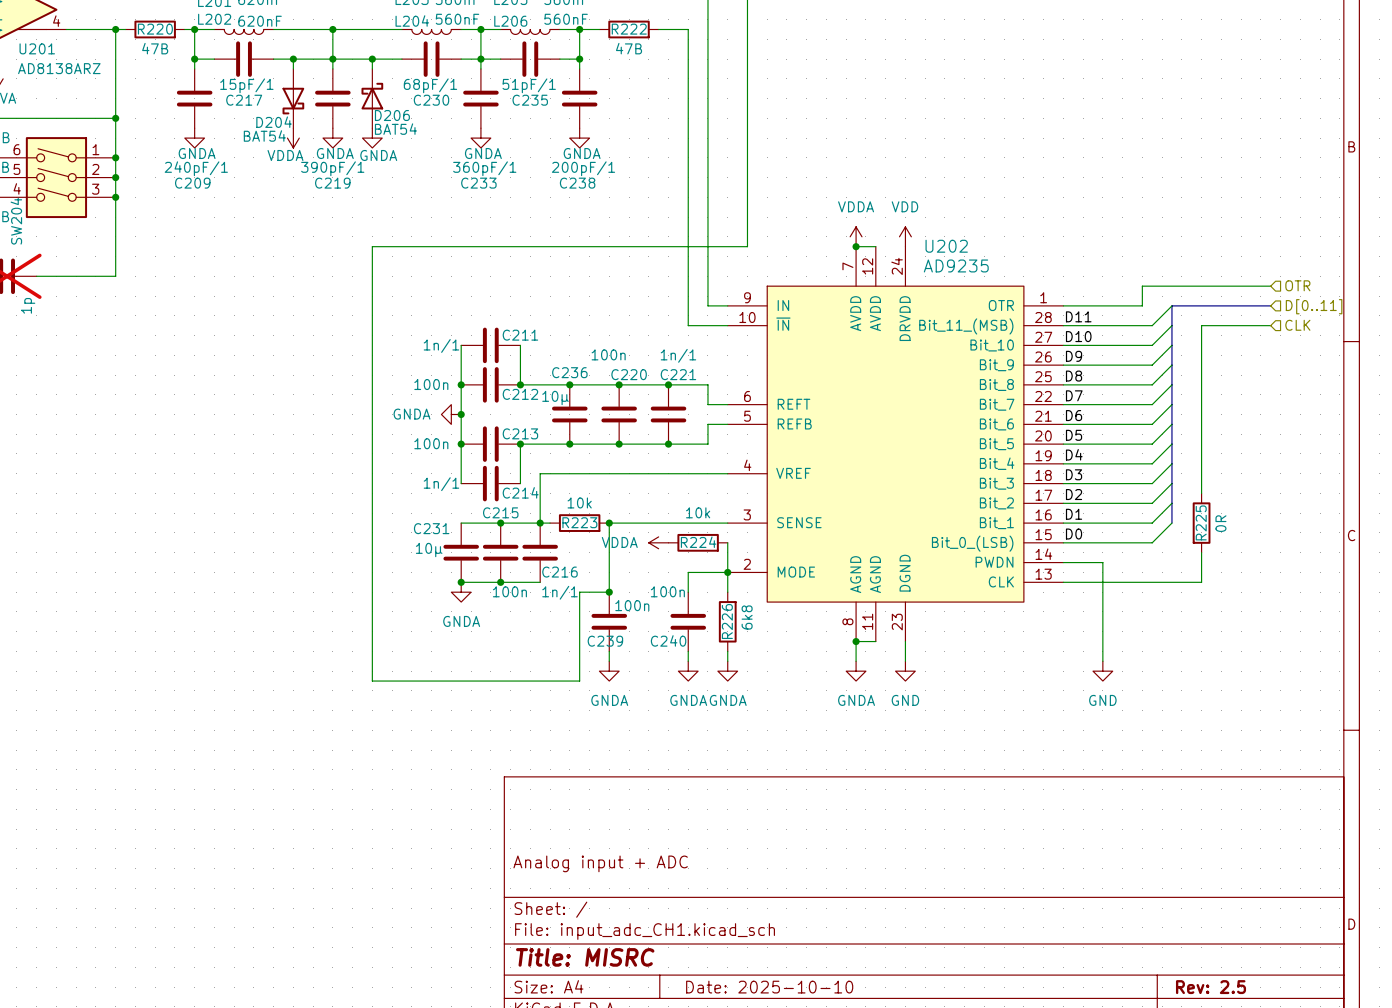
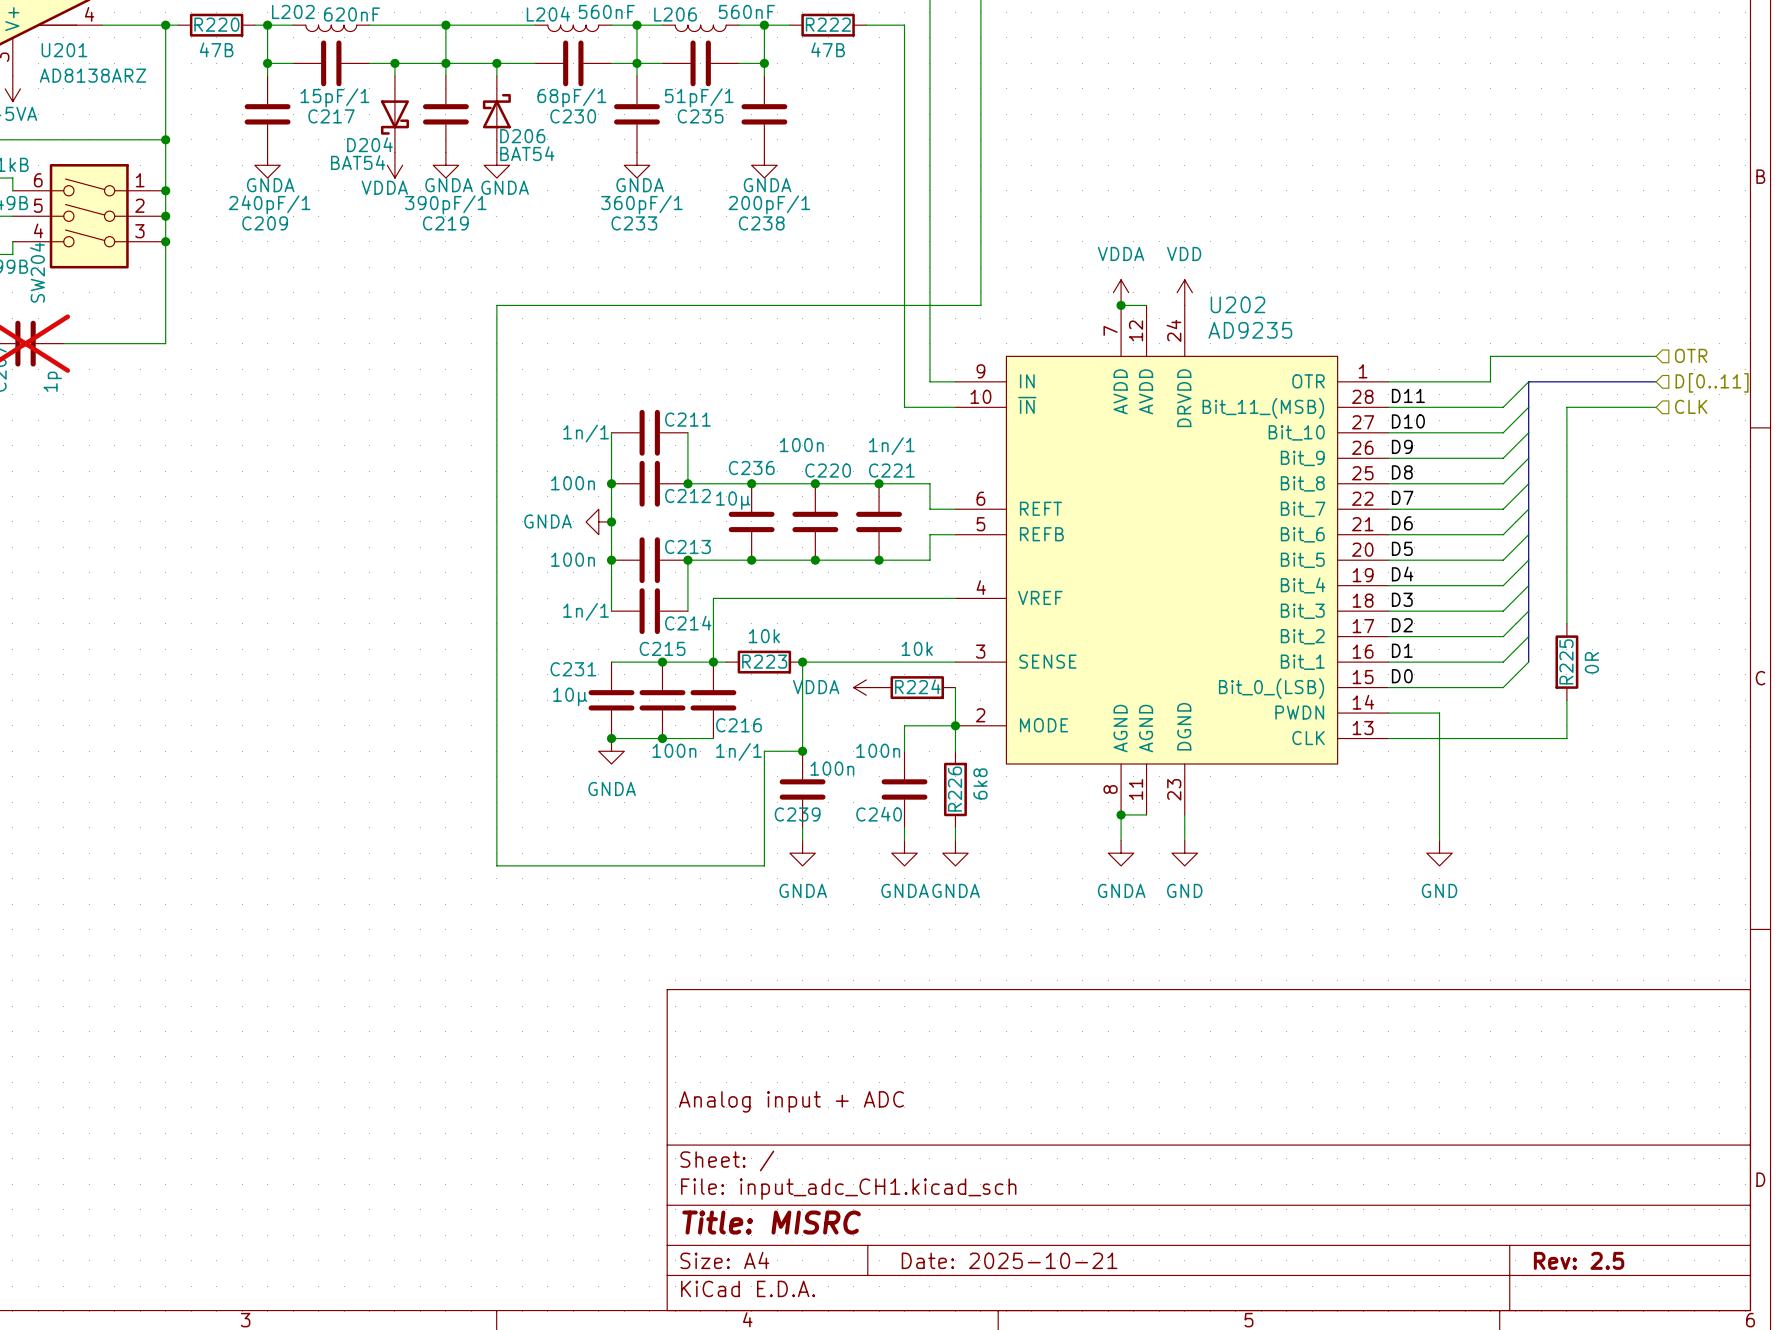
title block: Date: 2025-10-10 (769, 987) -> Date: 2025-10-21 (1009, 1260)

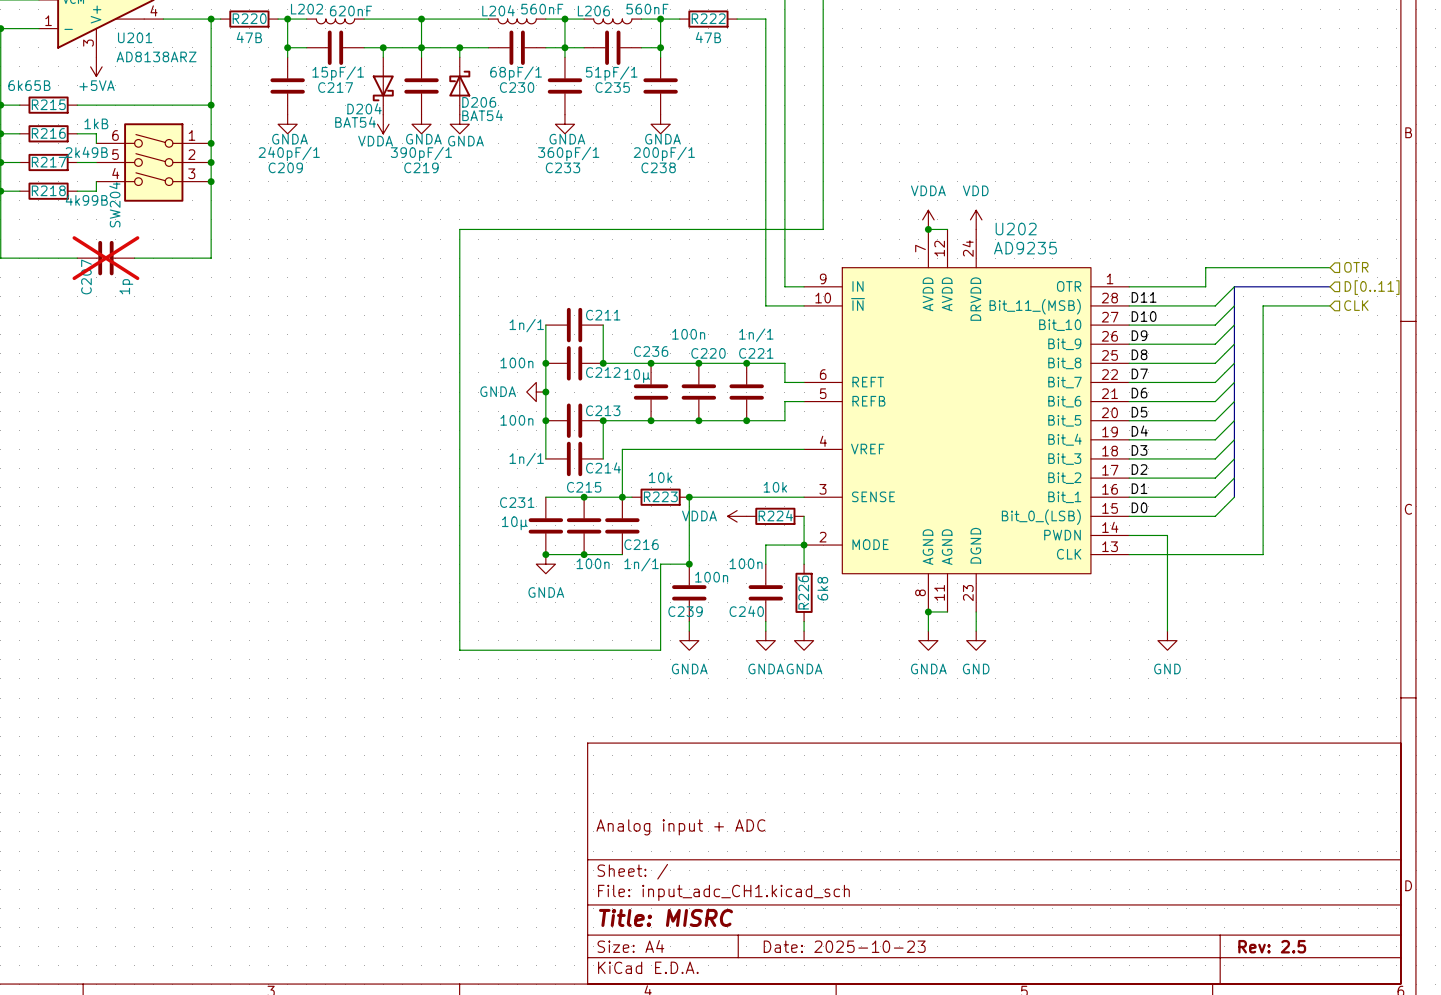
R225: 0R (1566, 662) -> none
title block: Date: 2025-10-21 (1009, 1260) -> Date: 2025-10-23 (844, 946)

